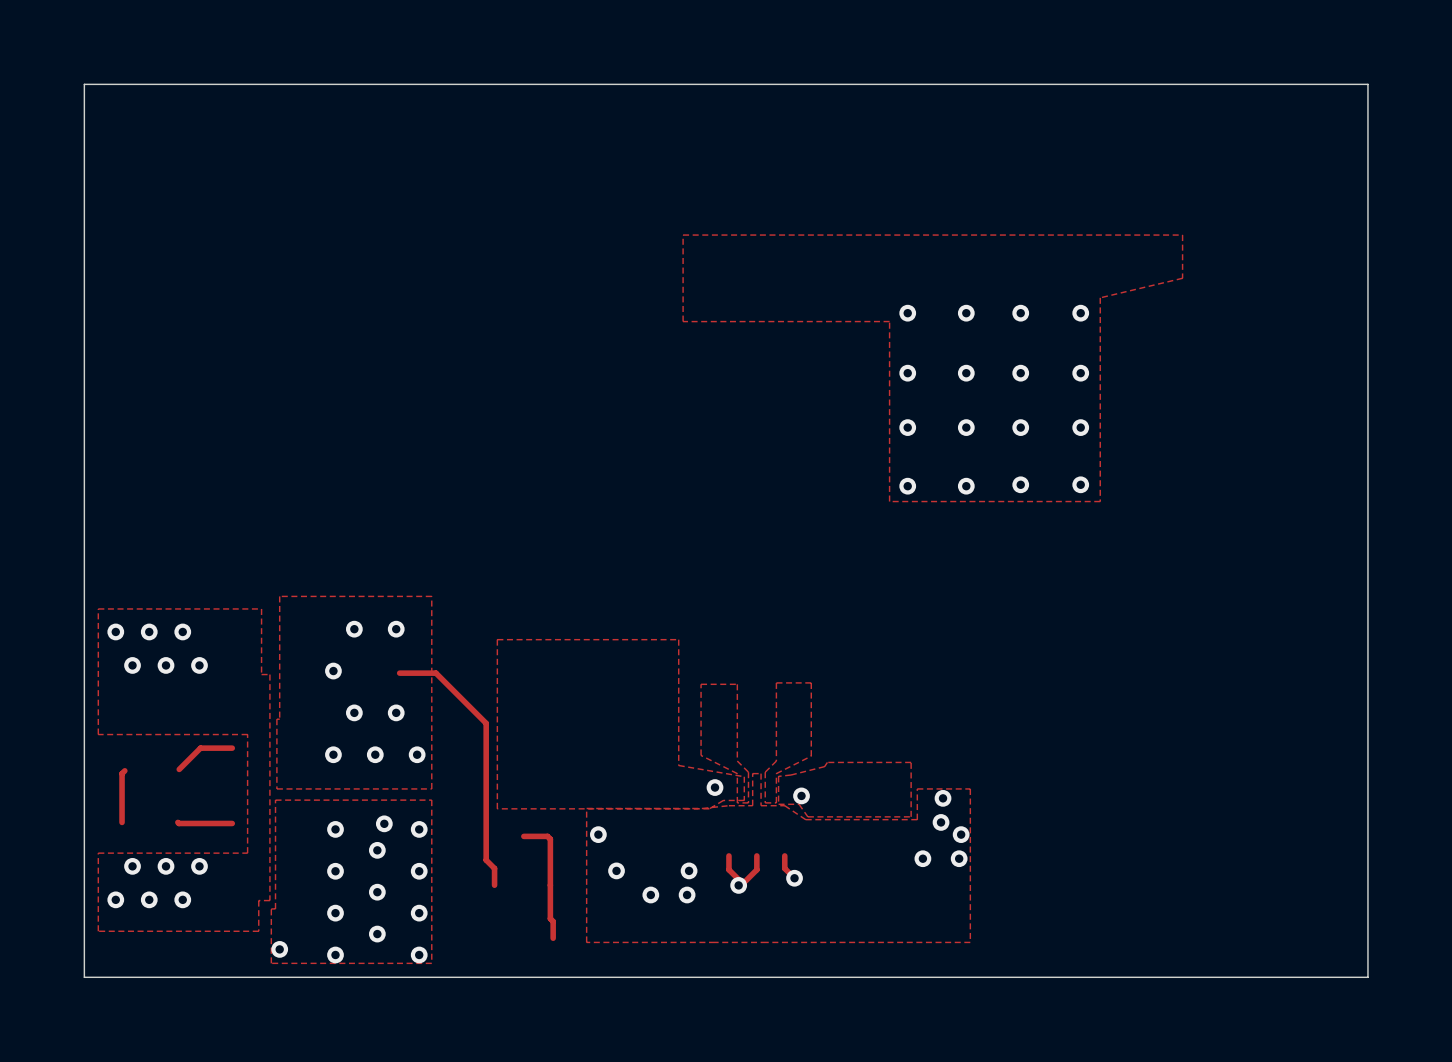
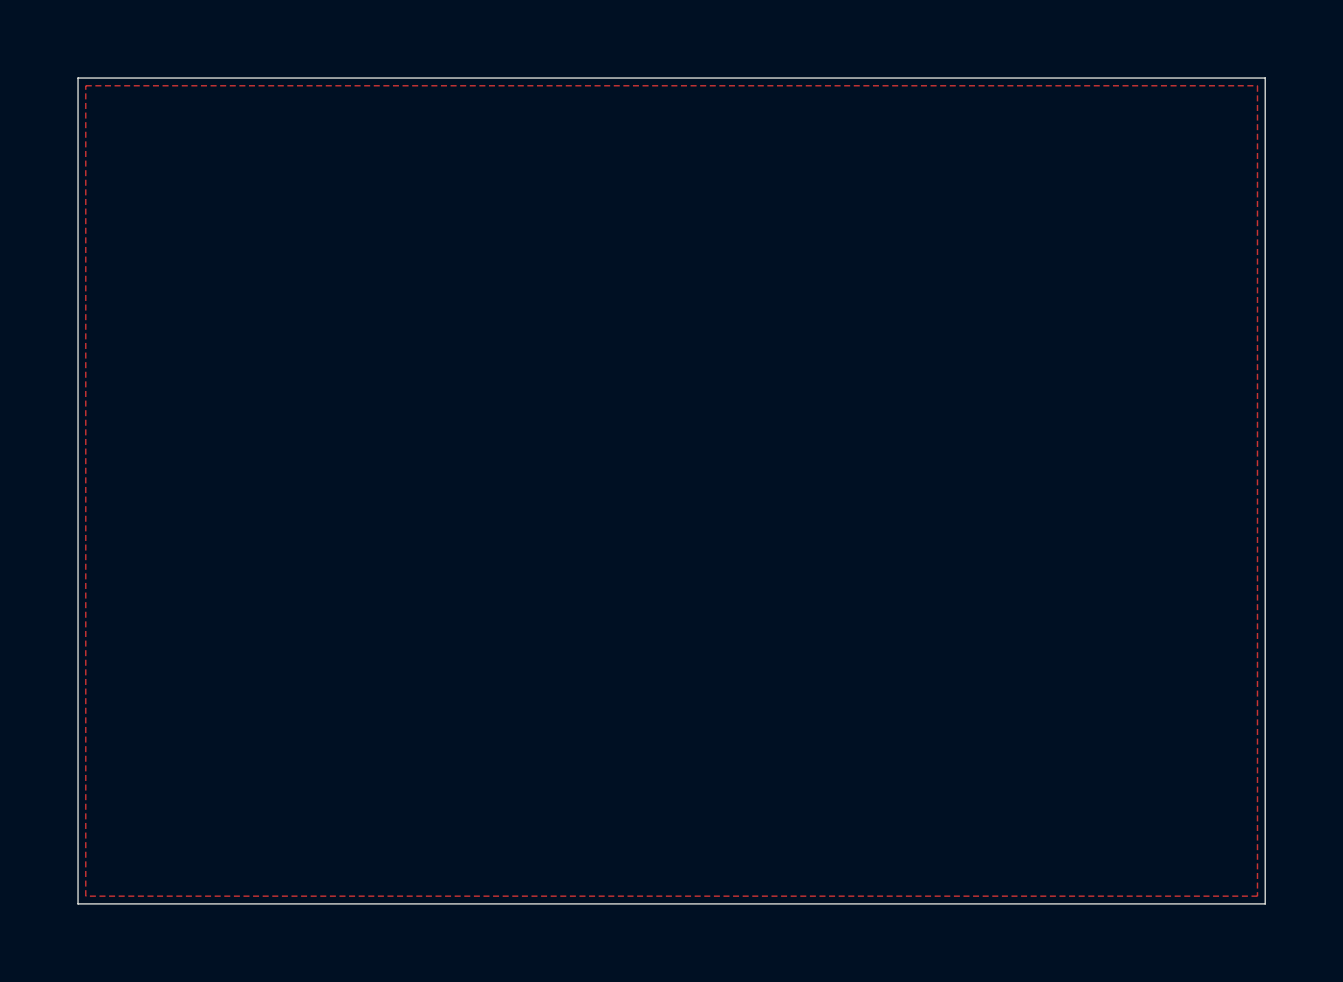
zone outline: none -> (85, 85) (1257, 85) (1257, 896) (85, 896) (85, 85)
zone outline: (683, 235) (683, 321) (889, 321) (889, 501) (1100, 501) (1100, 297) (1182, 278) (1182, 235) (683, 235) -> none
via: (907, 313) -> none
via: (966, 313) -> none
via: (1020, 313) -> none
via: (1080, 313) -> none
via: (907, 373) -> none
via: (966, 373) -> none
via: (1020, 373) -> none
via: (1080, 373) -> none
via: (907, 427) -> none
via: (966, 427) -> none
via: (1020, 427) -> none
via: (1080, 427) -> none
via: (1020, 484) -> none
via: (1080, 484) -> none
via: (907, 486) -> none
via: (966, 486) -> none
zone outline: (279, 596) (431, 596) (431, 788) (276, 788) (276, 719) (279, 719) (279, 596) -> none
zone outline: (98, 608) (98, 734) (247, 734) (247, 853) (98, 853) (98, 931) (258, 931) (258, 900) (269, 900) (269, 674) (261, 674) (261, 608) (98, 608) -> none
via: (354, 629) -> none
via: (396, 629) -> none
via: (115, 631) -> none
via: (149, 631) -> none
via: (182, 631) -> none
zone outline: (497, 639) (497, 808) (709, 808) (723, 800) (744, 800) (744, 776) (678, 765) (678, 639) (497, 639) -> none
via: (132, 665) -> none
via: (166, 665) -> none
via: (199, 665) -> none
via: (333, 671) -> none
track: (399, 673) (435, 673) (486, 723) (486, 860) (494, 868) (494, 885) -> none
zone outline: (776, 682) (811, 682) (811, 756) (776, 773) (776, 802) (765, 802) (765, 772) (776, 761) (776, 682) -> none
zone outline: (701, 684) (737, 684) (737, 761) (748, 772) (748, 802) (737, 802) (737, 773) (701, 755) (701, 684) -> none
via: (354, 712) -> none
via: (396, 712) -> none
track: (232, 748) (200, 748) (179, 769) -> none
via: (333, 754) -> none
via: (375, 754) -> none
via: (417, 754) -> none
zone outline: (827, 762) (911, 762) (911, 816) (807, 816) (799, 804) (778, 804) (778, 776) (824, 766) (827, 762) -> none
track: (124, 770) (122, 773) (122, 822) -> none
zone outline: (752, 773) (752, 805) (702, 808) (586, 808) (586, 942) (970, 942) (970, 788) (917, 788) (917, 819) (805, 819) (784, 805) (761, 805) (761, 773) (752, 773) -> none
via: (715, 787) -> none
via: (801, 795) -> none
via: (943, 798) -> none
zone outline: (275, 800) (275, 908) (271, 908) (271, 963) (431, 963) (431, 800) (275, 800) -> none
track: (177, 822) (232, 823) -> none
via: (941, 822) -> none
via: (384, 823) -> none
via: (335, 829) -> none
via: (419, 829) -> none
via: (598, 834) -> none
via: (961, 834) -> none
track: (523, 836) (547, 836) (550, 839) (550, 918) (553, 921) (553, 938) -> none
via: (377, 850) -> none
track: (728, 855) (728, 869) (740, 881) -> none
track: (756, 855) (756, 869) (745, 881) -> none
track: (784, 855) (784, 868) (794, 878) -> none
via: (922, 858) -> none
via: (959, 858) -> none
via: (132, 866) -> none
via: (166, 866) -> none
via: (199, 866) -> none
via: (616, 870) -> none
via: (689, 870) -> none
via: (335, 871) -> none
via: (419, 871) -> none
via: (794, 878) -> none
via: (738, 885) -> none
via: (377, 892) -> none
via: (650, 894) -> none
via: (687, 894) -> none
via: (115, 899) -> none
via: (149, 899) -> none
via: (182, 899) -> none
via: (335, 913) -> none
via: (419, 913) -> none
via: (377, 934) -> none
via: (279, 949) -> none
via: (335, 954) -> none
via: (419, 954) -> none

